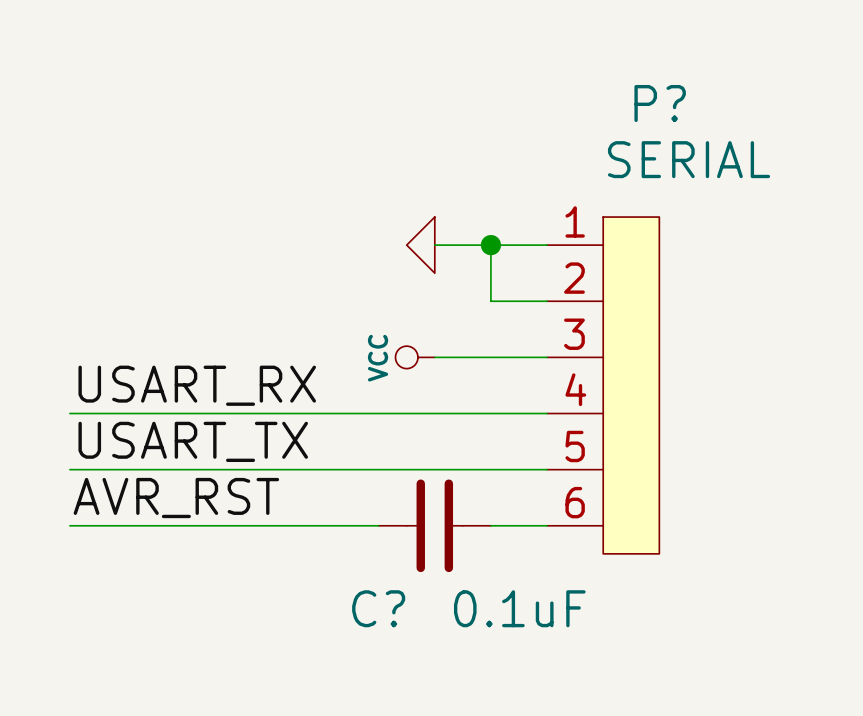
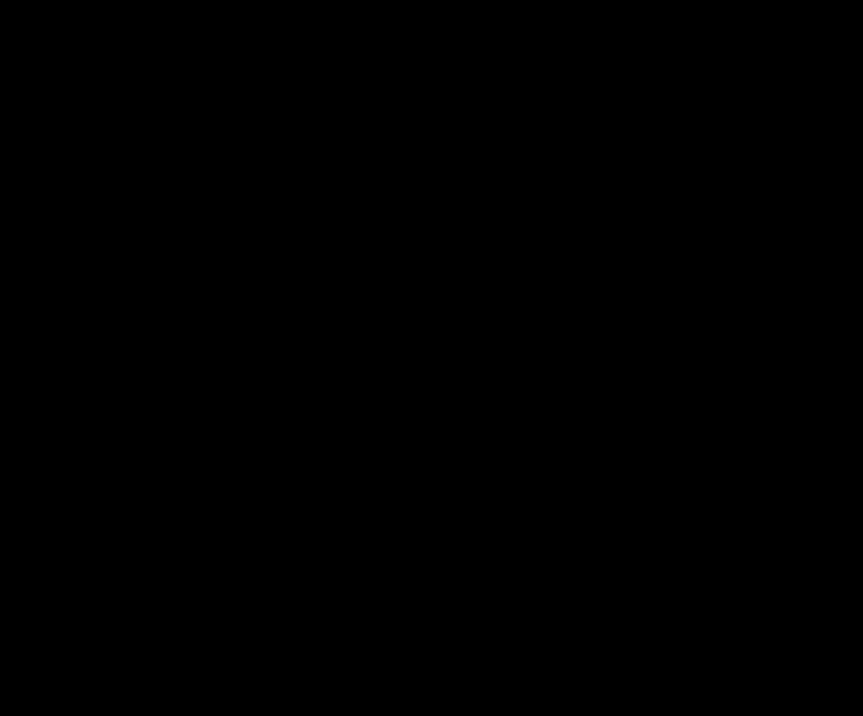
power symbol: (420, 245) -> none
wire: (434, 245) (547, 245) -> none
wire: (490, 245) (490, 301) (547, 301) -> none
junction: (490, 245) -> none
power symbol: VCC (415, 357) -> none
wire: (434, 357) (547, 357) -> none
label: USART_RX (197, 385) -> none
P?: SERIAL (603, 385) -> none
wire: (69, 413) (547, 413) -> none
label: USART_TX (193, 441) -> none
wire: (69, 469) (547, 469) -> none
label: AVR_RST (176, 498) -> none
wire: (69, 525) (378, 525) -> none
C?: 0.1uF (434, 525) -> none
wire: (490, 525) (547, 525) -> none

